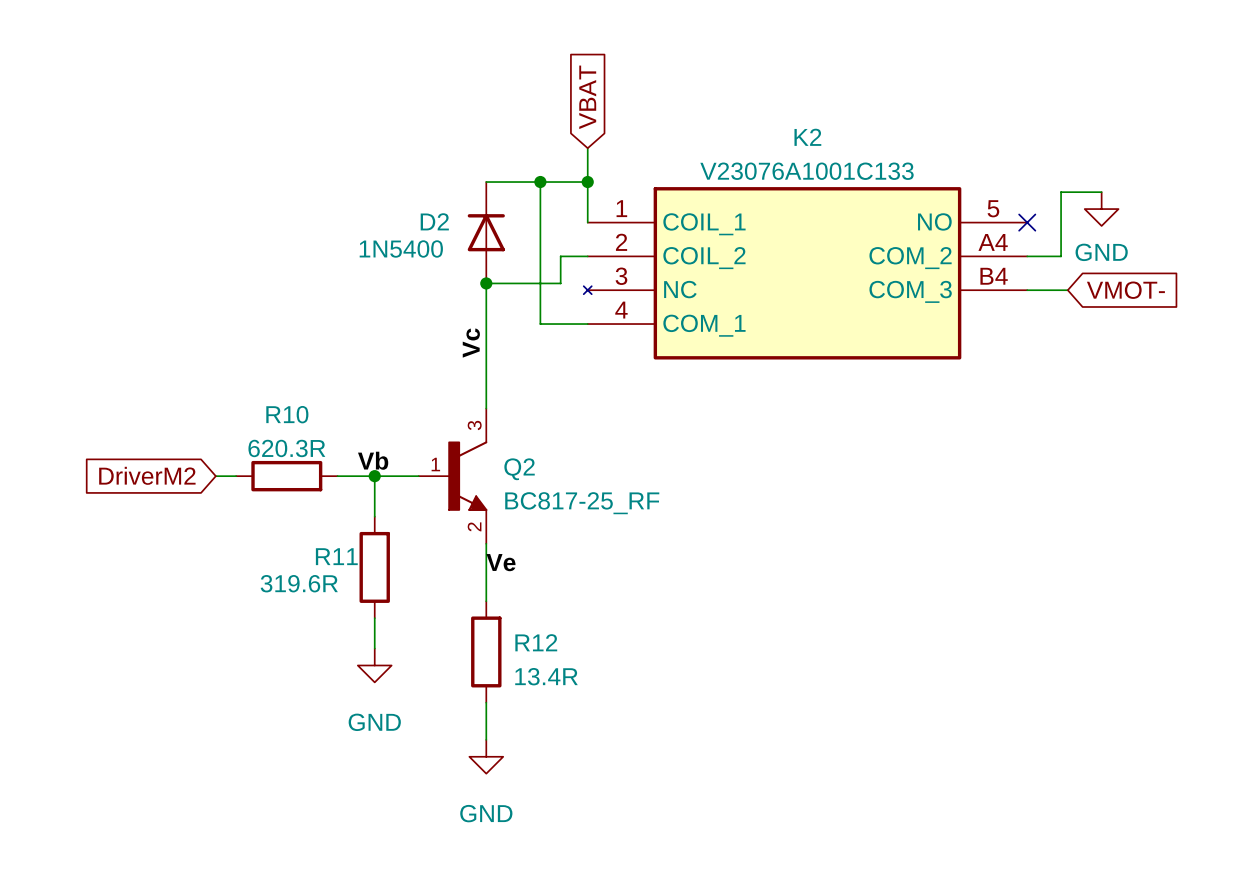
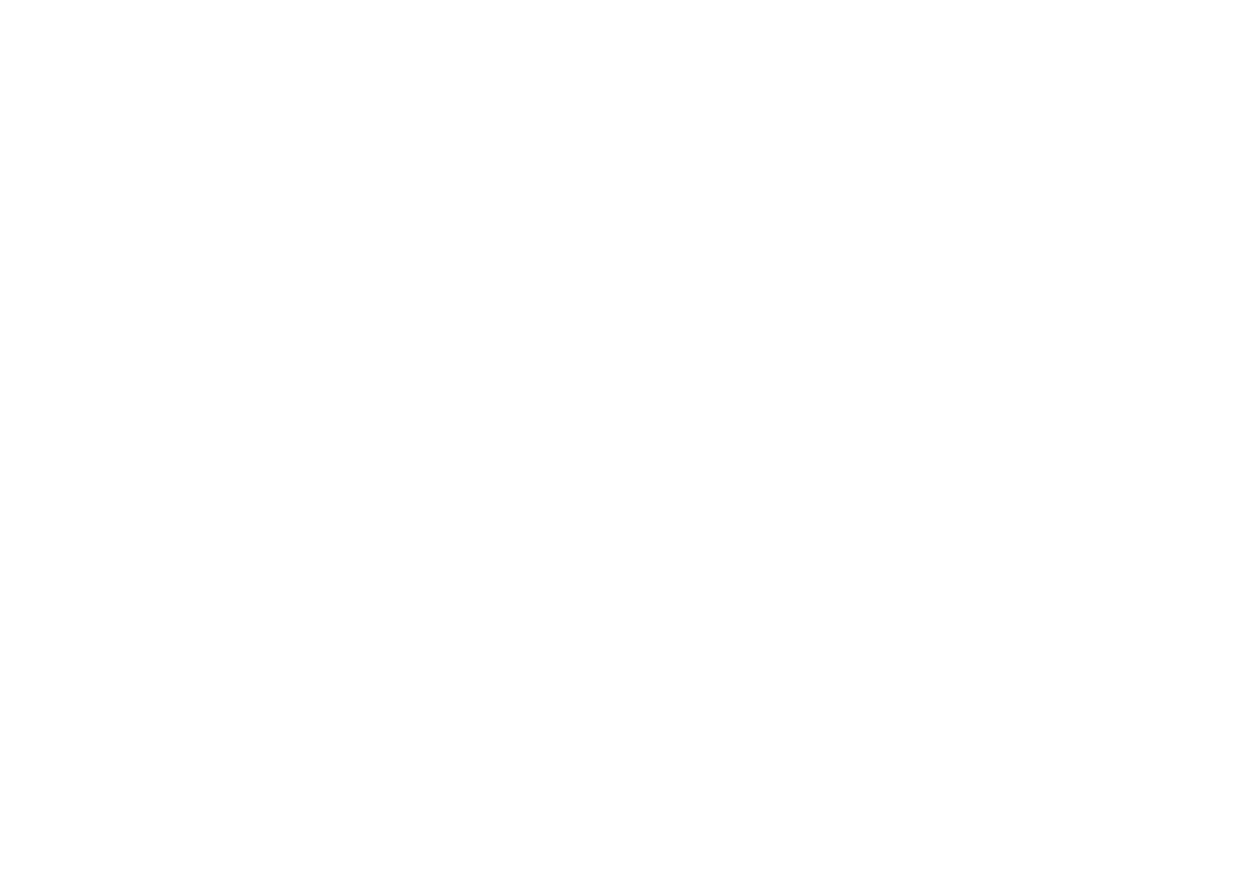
global label: VBAT (587, 97) -> none
wire: (587, 148) (587, 222) -> none
wire: (486, 182) (587, 182) -> none
wire: (540, 182) (540, 324) (587, 324) -> none
junction: (540, 182) -> none
junction: (587, 182) -> none
wire: (1101, 192) (1061, 192) (1061, 256) (1027, 256) -> none
power symbol: GND (1101, 209) -> none
no-connect mark: (1027, 222) -> none
D2: 1N5400 (486, 232) -> none
wire: (587, 256) (560, 256) (560, 283) (486, 283) (486, 408) -> none
K2: V23076A1001C133 (805, 273) -> none
junction: (486, 283) -> none
wire: (1027, 290) (1067, 290) -> none
global label: VMOT- (1125, 290) -> none
label: Vc (471, 343) -> none
label: Vb (373, 460) -> none
global label: DriverM2 (147, 475) -> none
wire: (215, 476) (236, 476) -> none
R10: 620.3R (286, 476) -> none
wire: (337, 476) (418, 476) -> none
wire: (374, 476) (374, 516) -> none
junction: (374, 476) -> none
Q2: BC817-25_RF (452, 476) -> none
wire: (486, 543) (486, 601) -> none
label: Ve (500, 562) -> none
R11: 319.6R (374, 567) -> none
wire: (374, 618) (374, 648) -> none
R12: 13.4R (486, 651) -> none
power symbol: GND (374, 665) -> none
wire: (486, 702) (486, 739) -> none
power symbol: GND (486, 756) -> none

